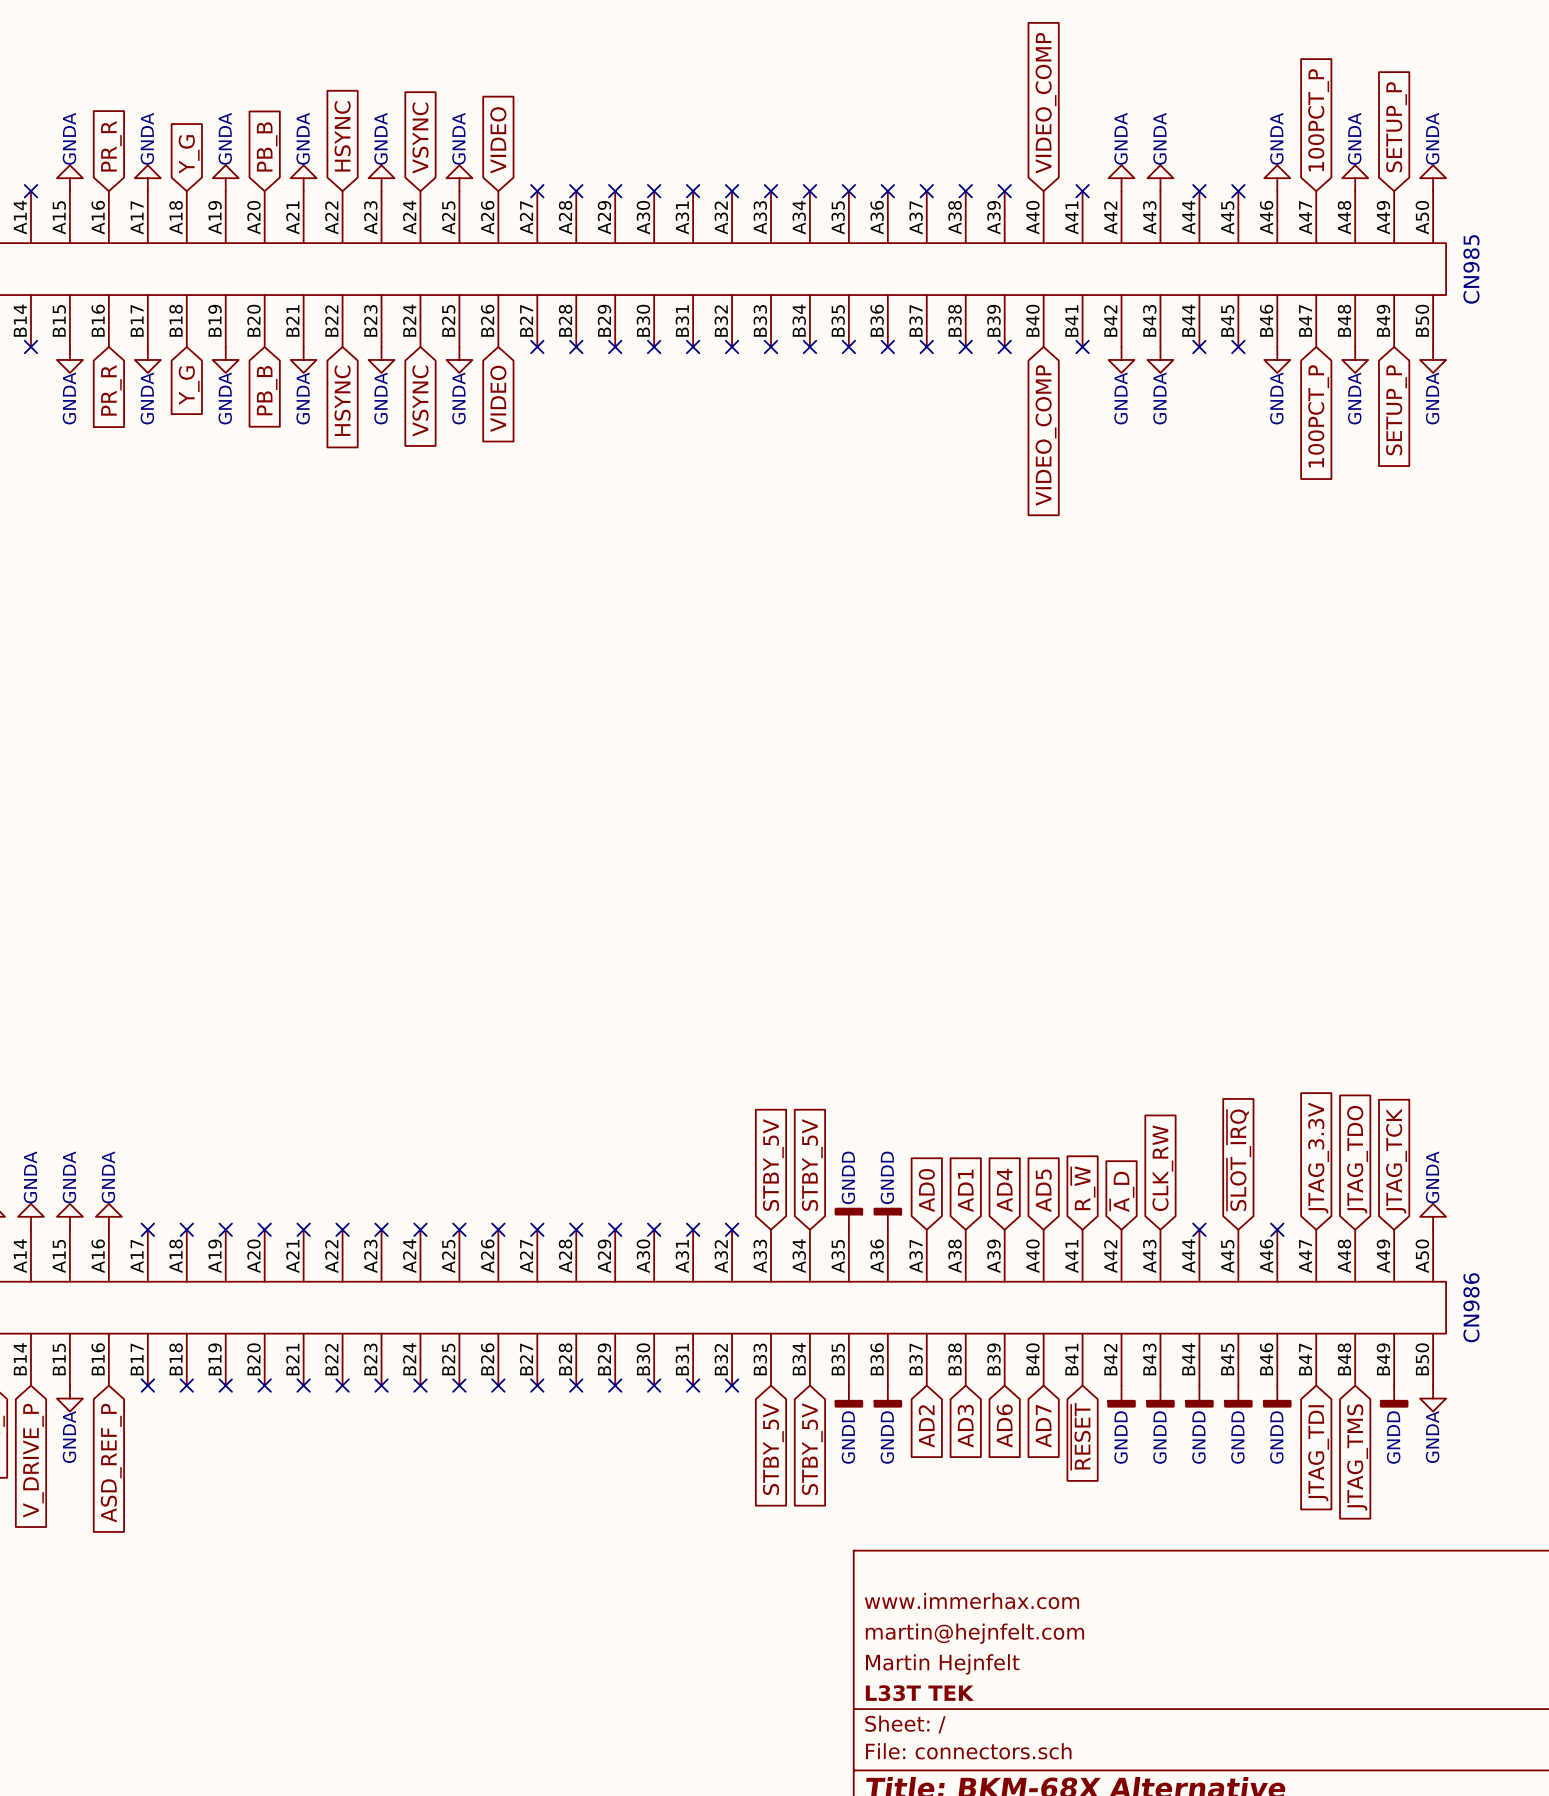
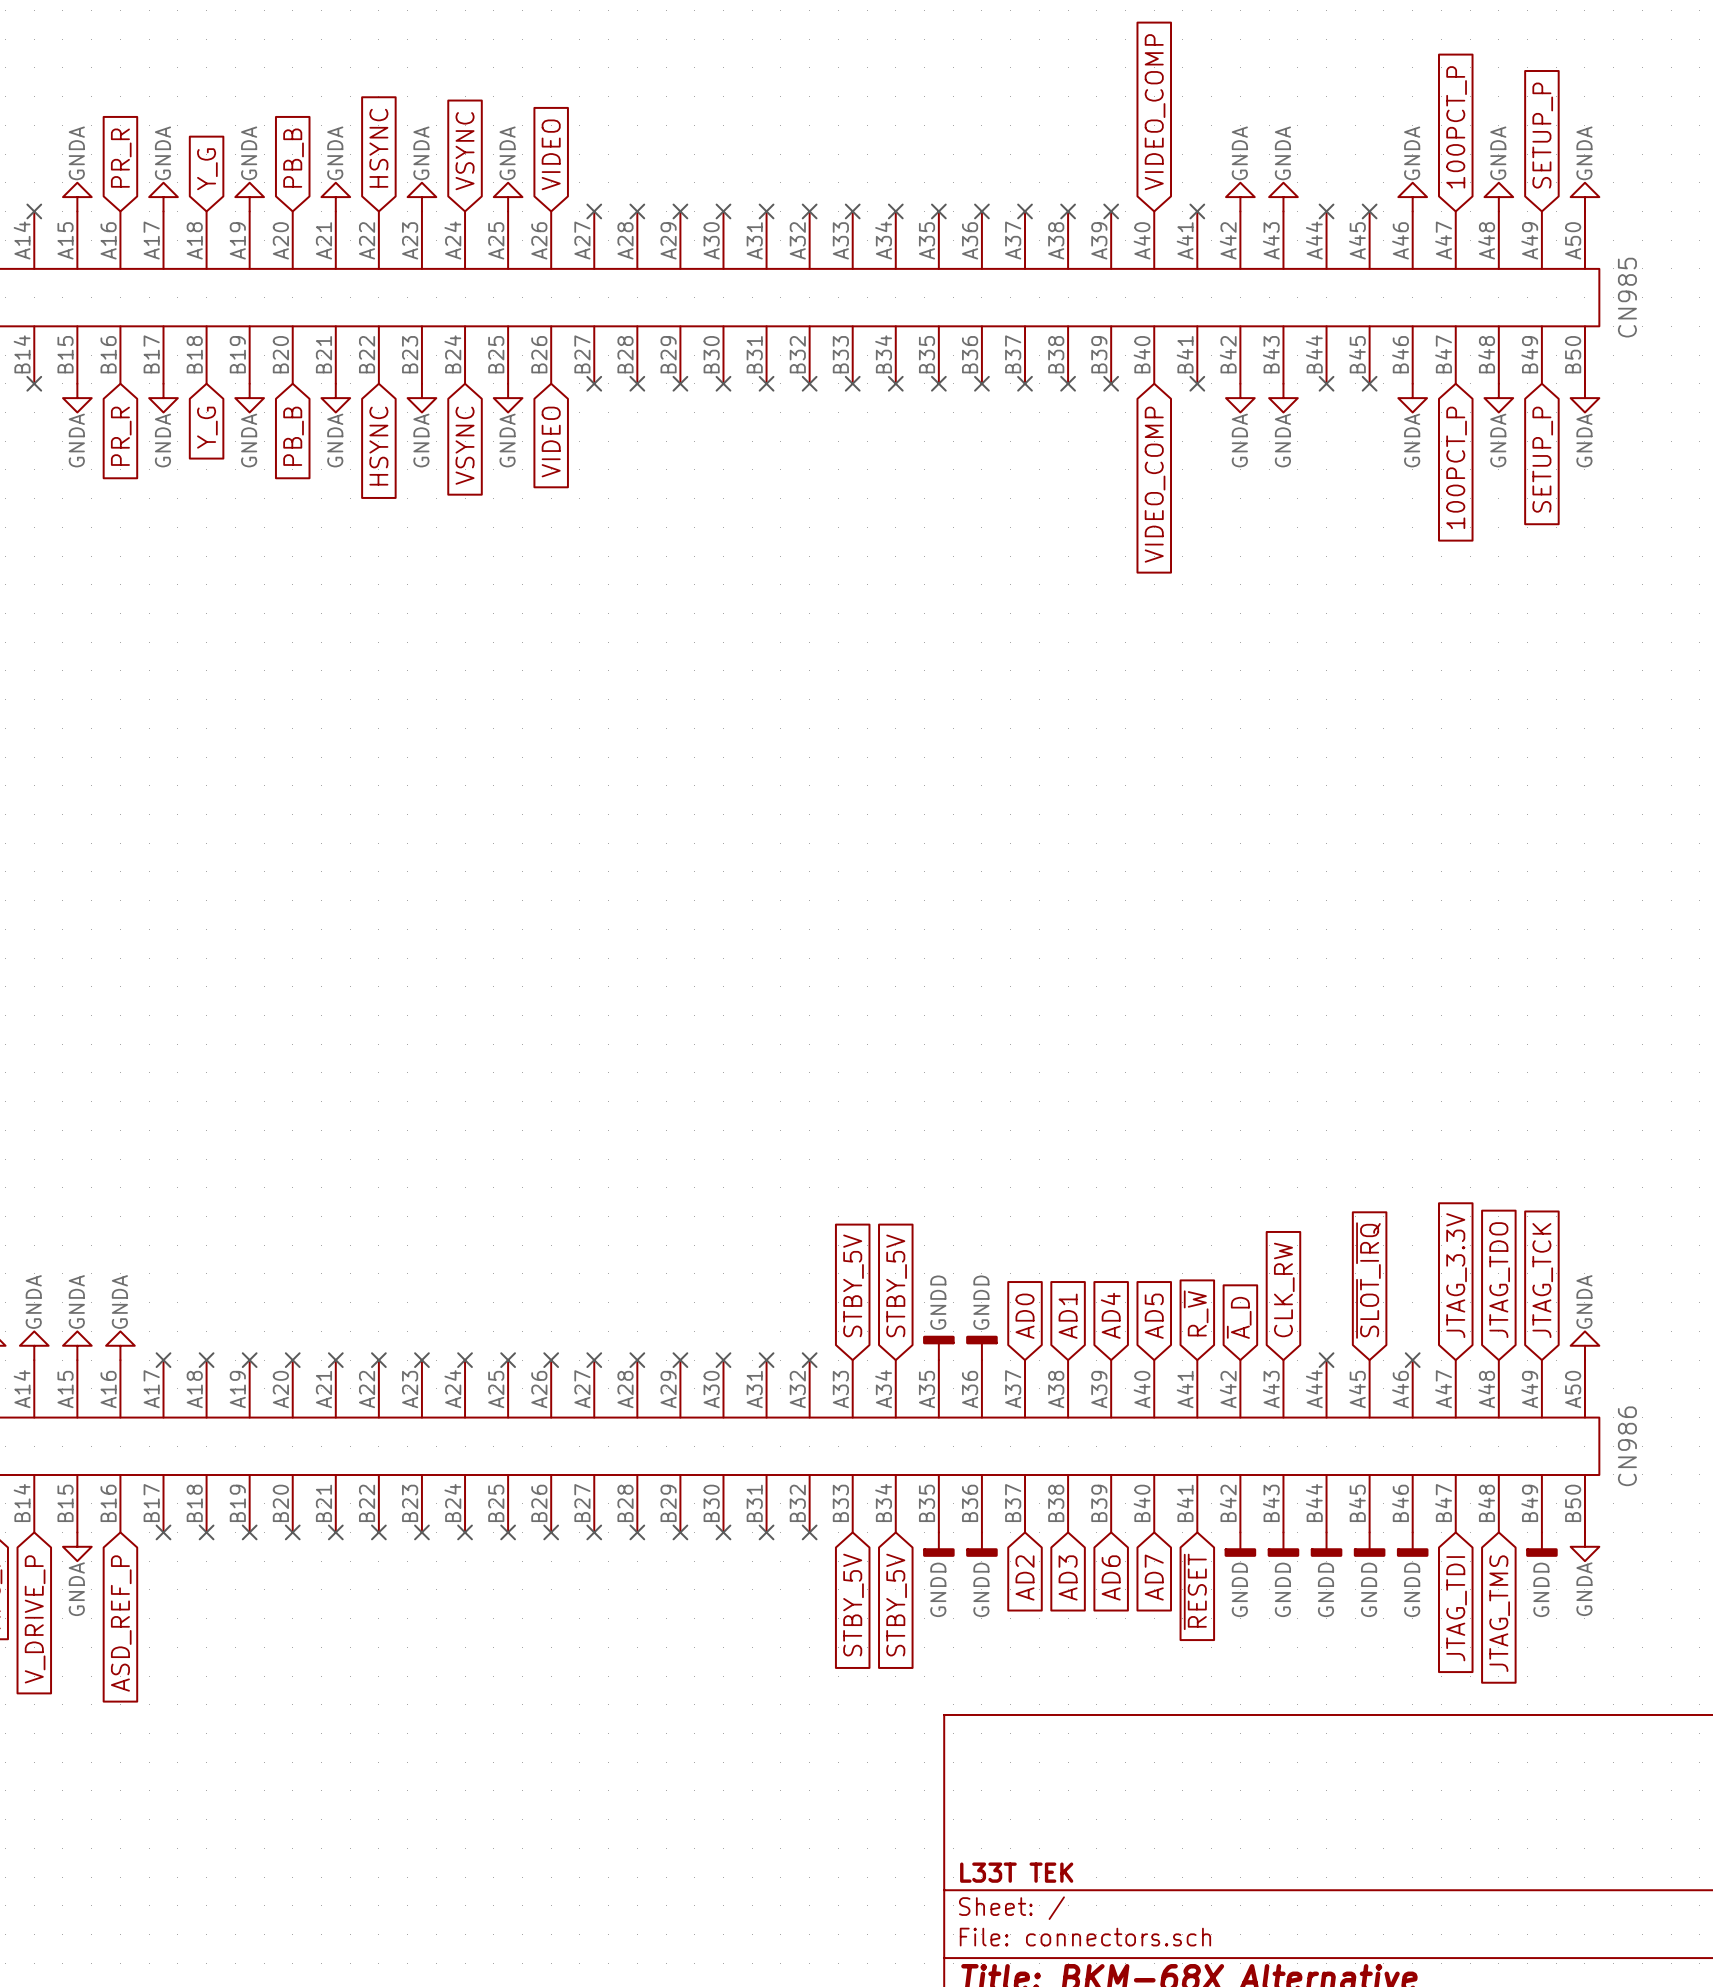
title block: www.immerhax.com (971, 1601) -> none
title block: martin@hejnfelt.com (974, 1633) -> none
title block: Martin Hejnfelt (942, 1664) -> none

